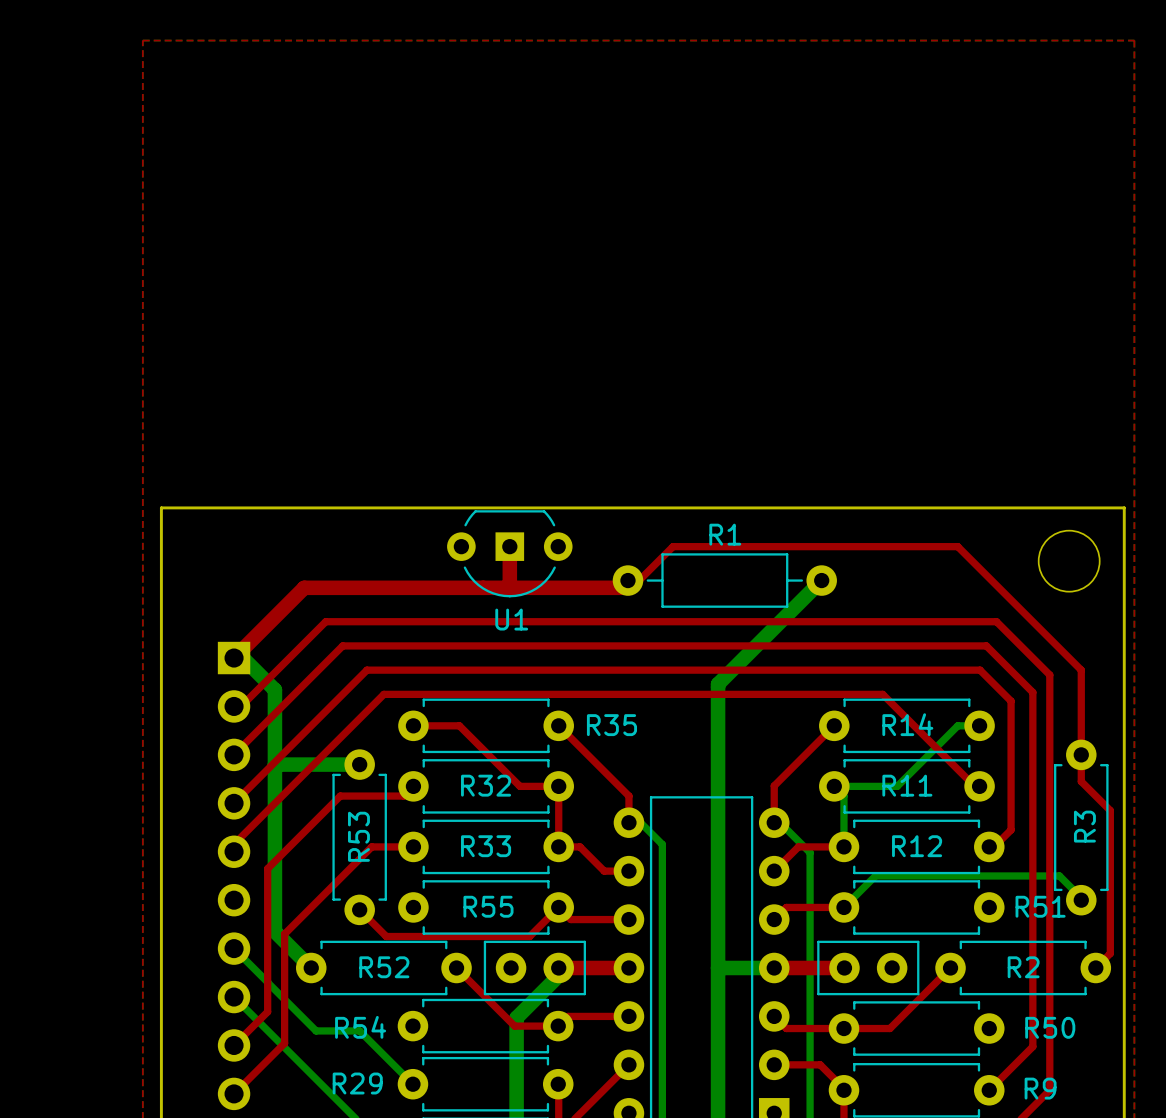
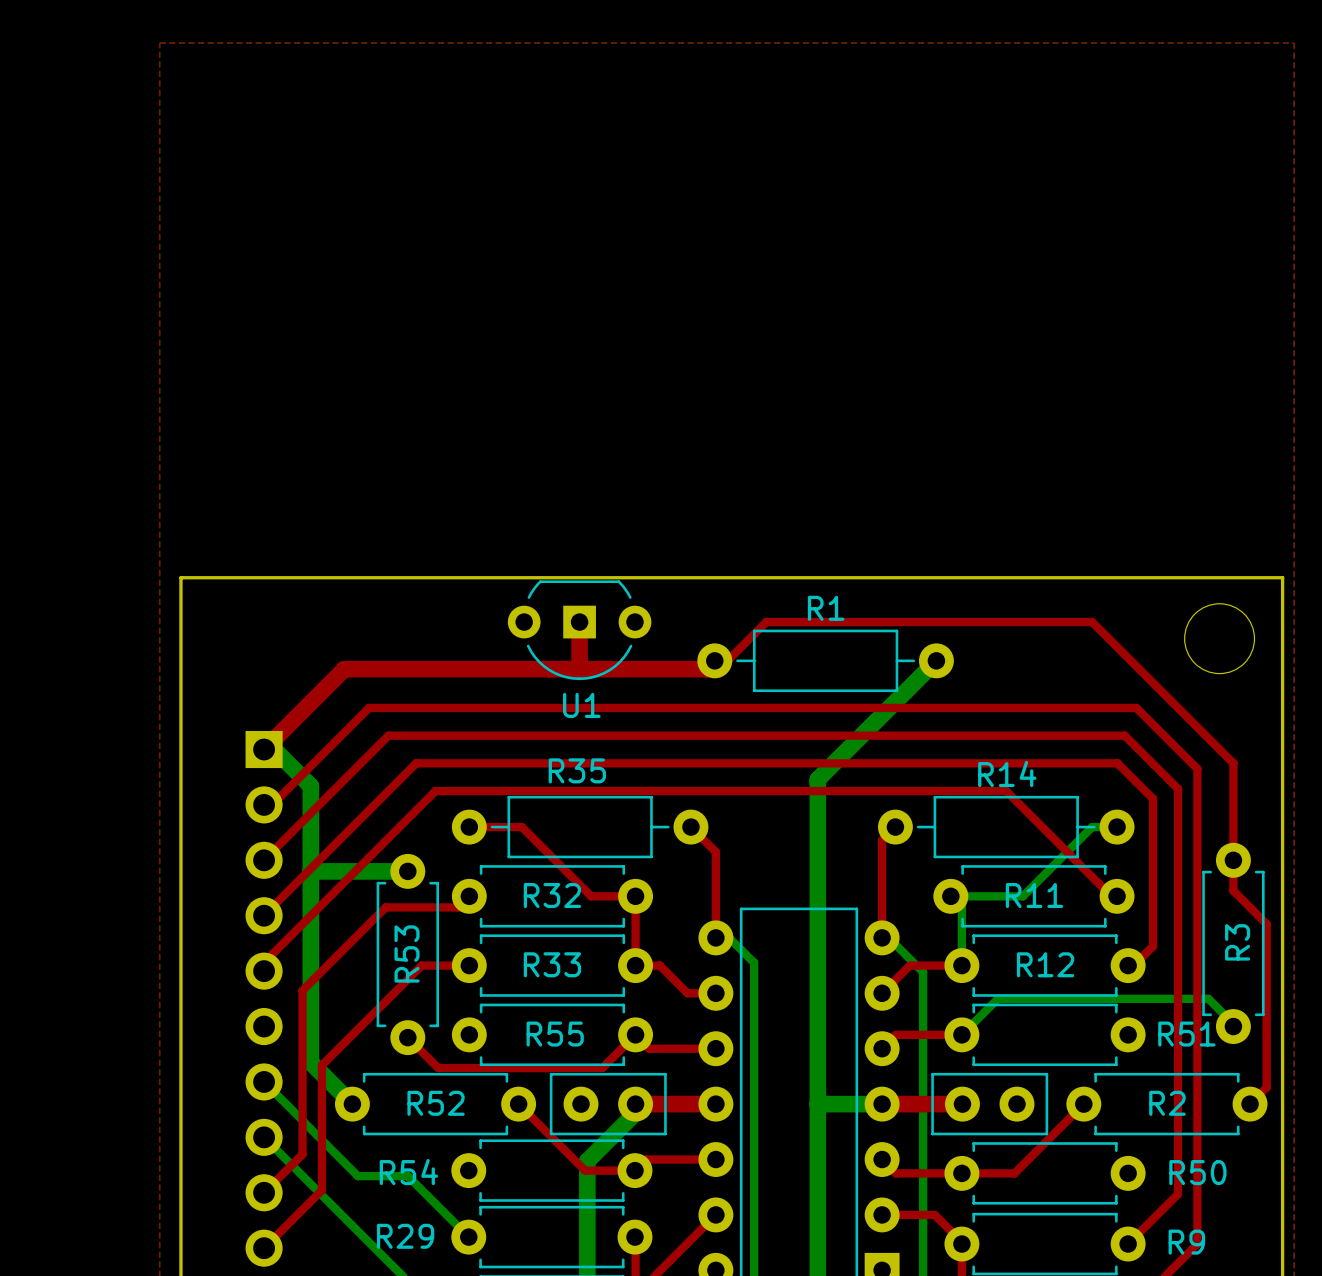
R35 footprint: [398, 698, 574, 754] -> [451, 795, 709, 859]
R14 footprint: [819, 698, 995, 754] -> [877, 795, 1135, 859]
R14 name position: R14 (907, 724) -> R14 (1007, 774)
top track: (558, 725) (628, 796) -> (690, 827) (715, 852) (715, 907)
R35 name position: R35 (611, 725) -> R35 (577, 770)
top track: (834, 725) (774, 785) -> (895, 827) (882, 840) (882, 895)

